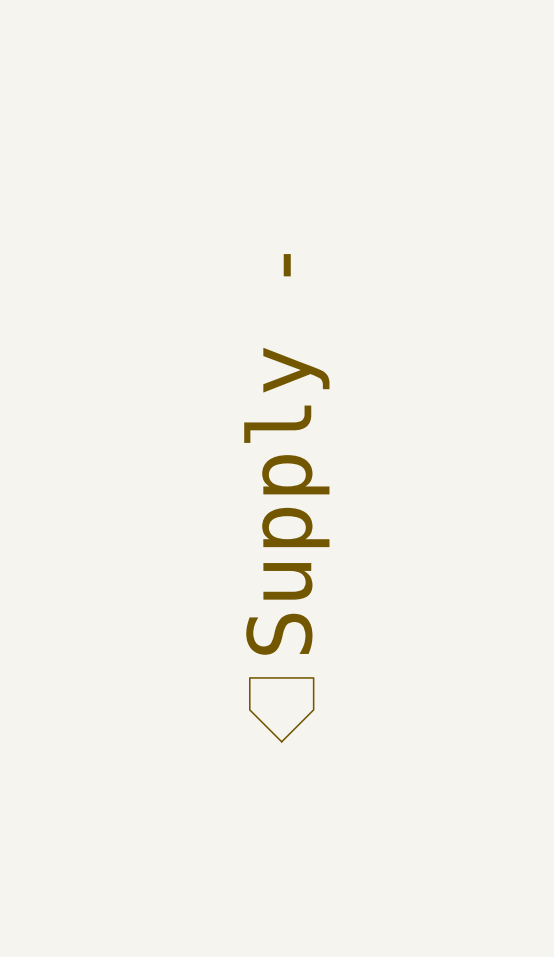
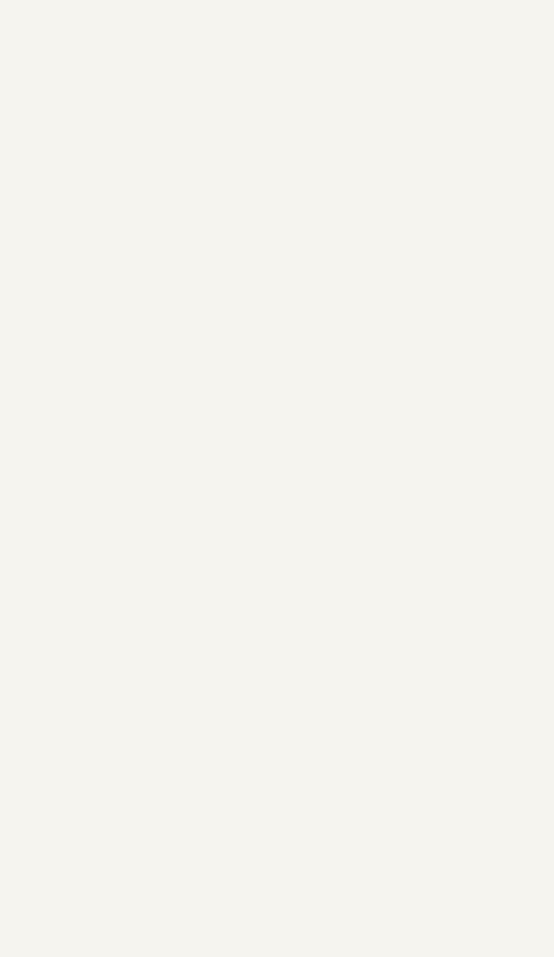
hierarchical label: Supply - (286, 454) -> none

